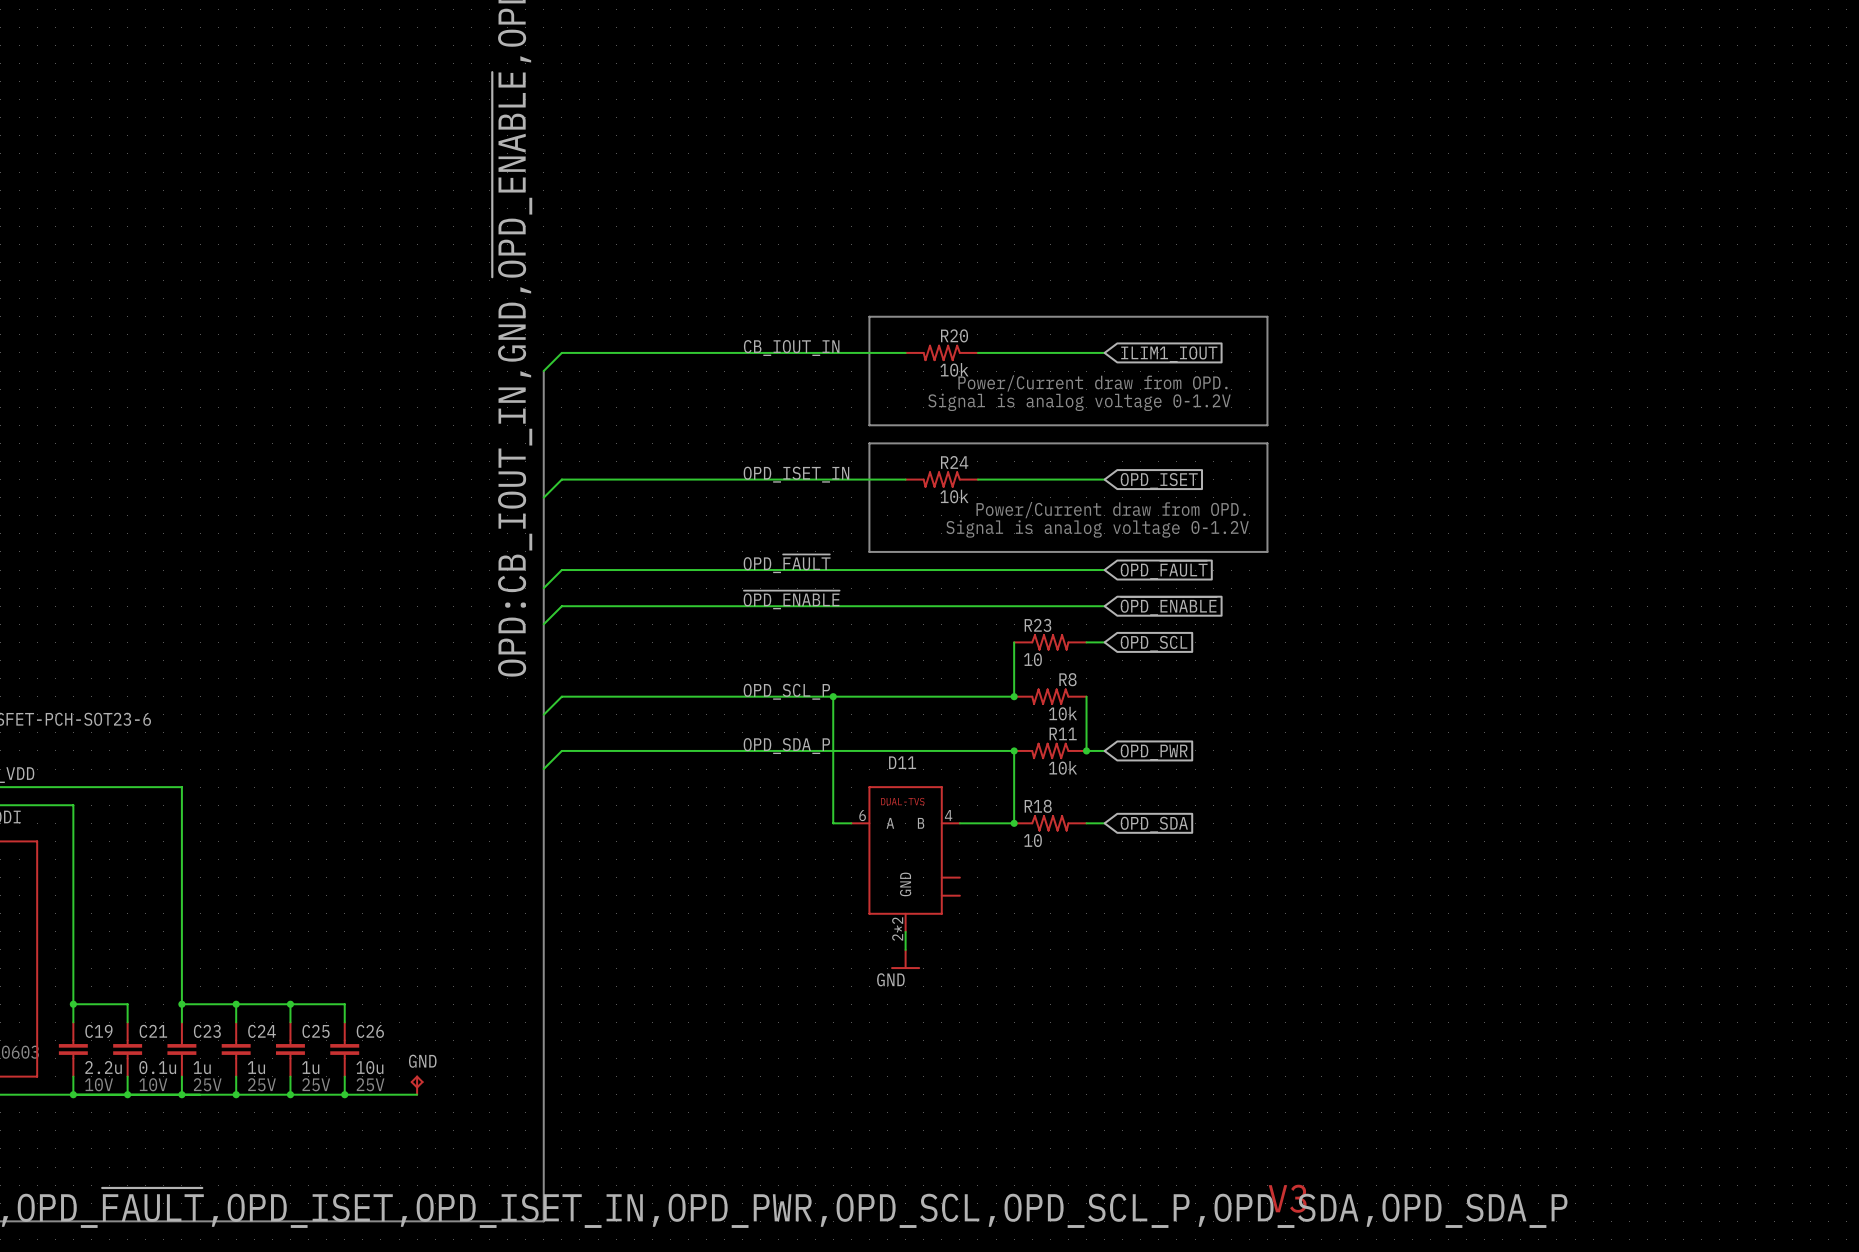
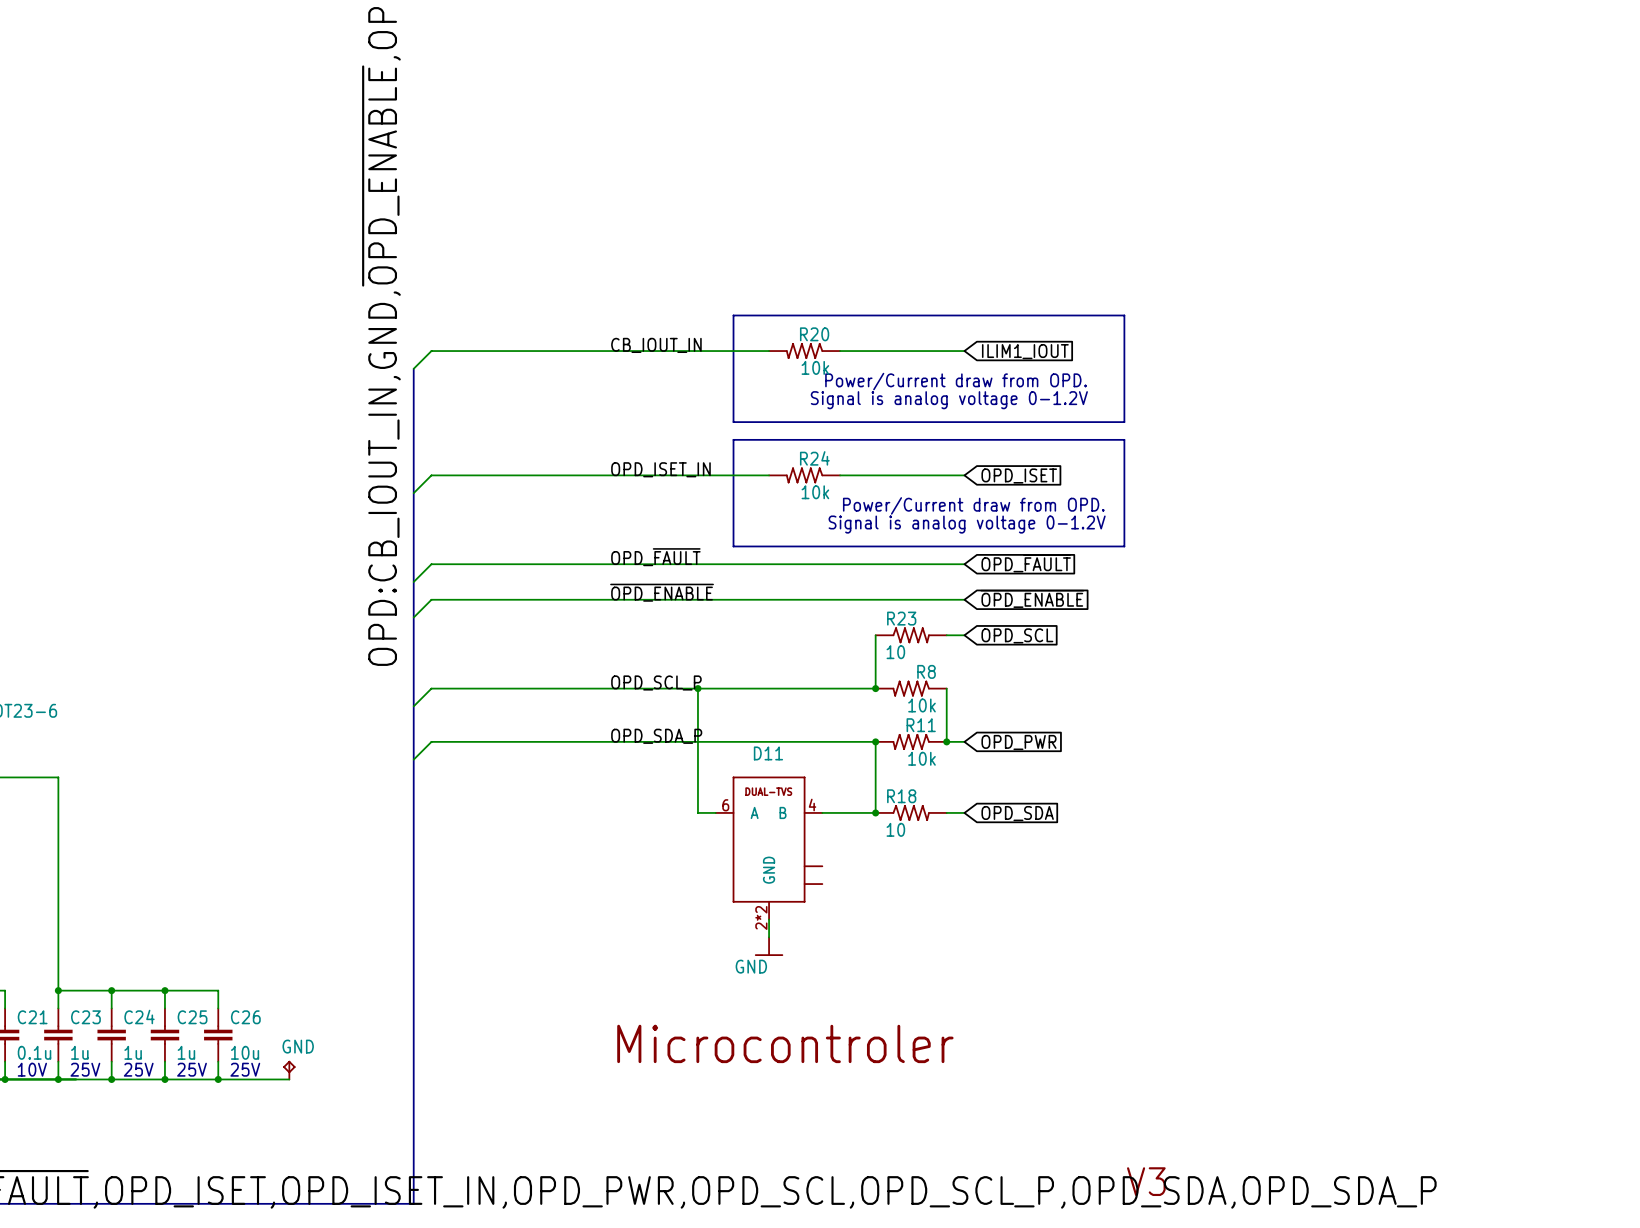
text: none -> Microcontroler (785, 1043)

